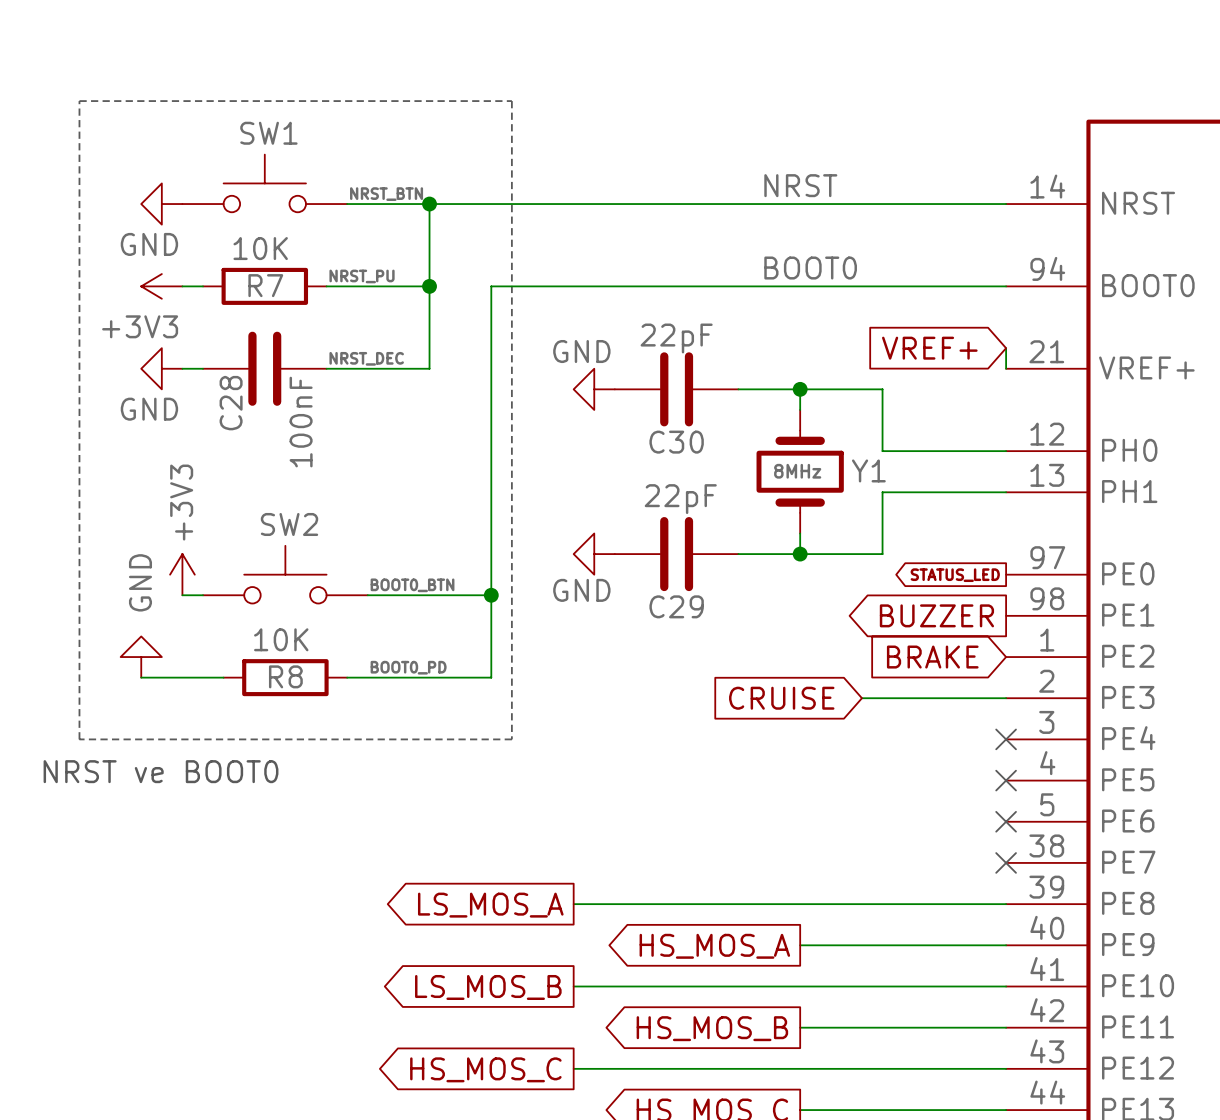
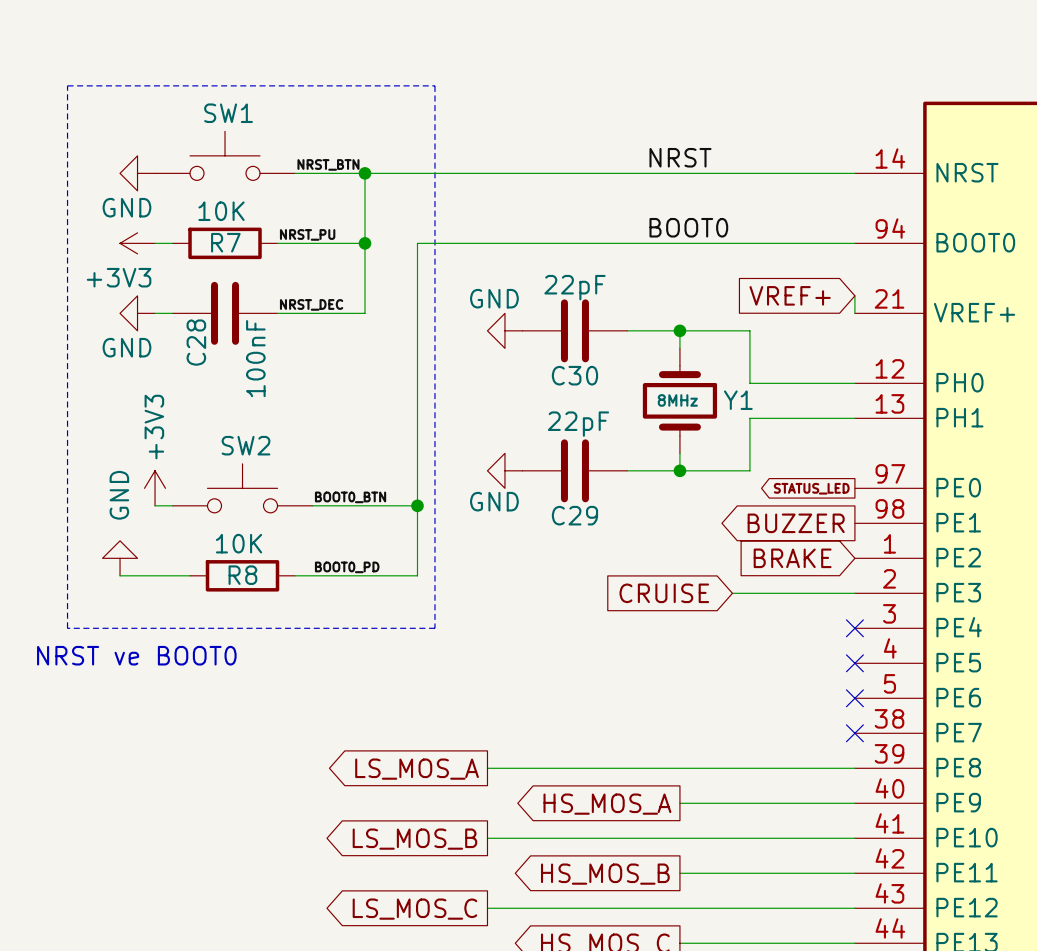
global label: HS_MOS_C (485, 1069) -> LS_MOS_C (414, 909)

